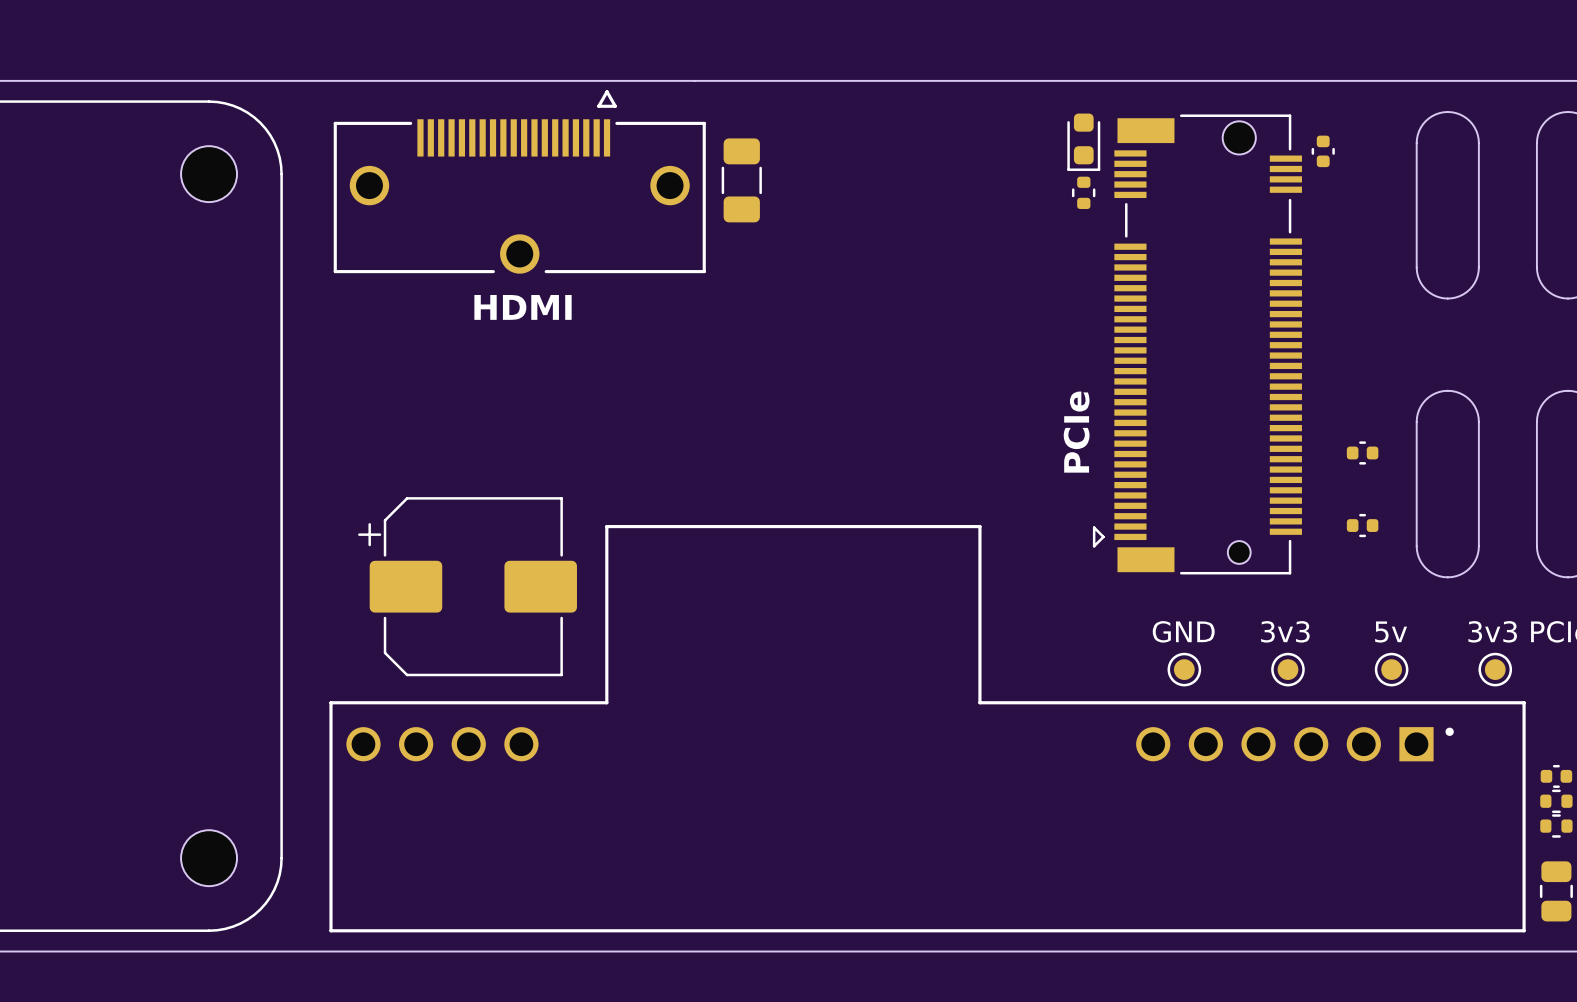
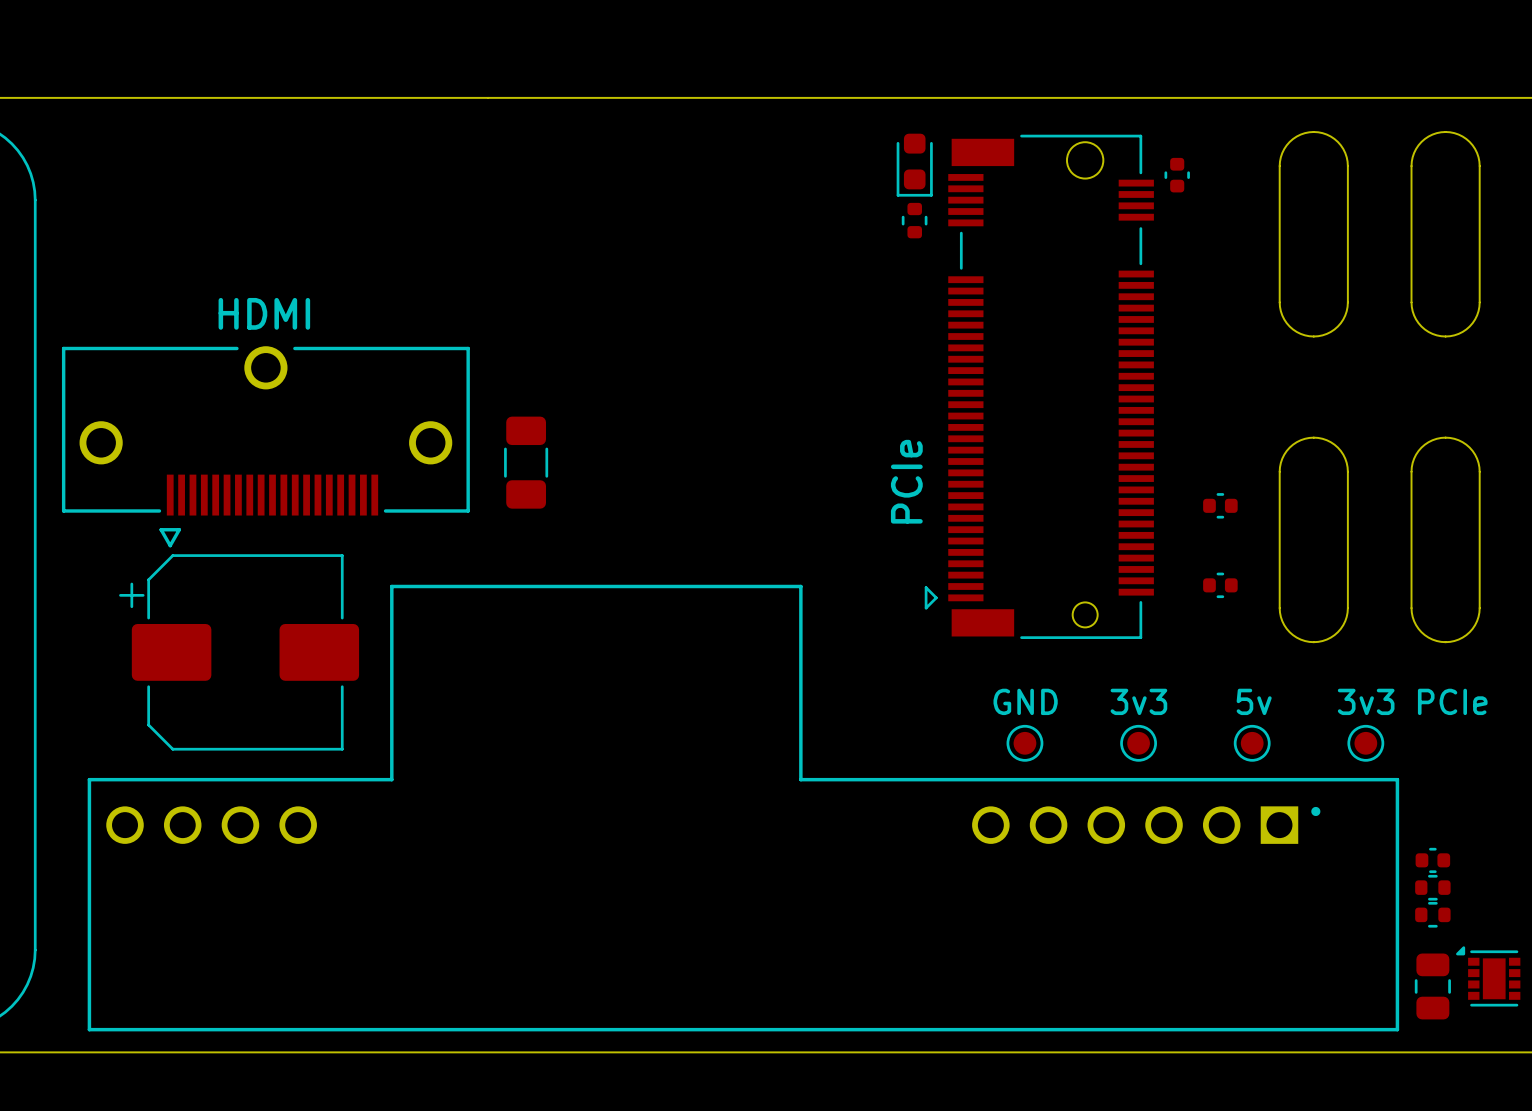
part position: (741, 180) -> (526, 462)
part rotation: 0° (519, 181) -> 180° (265, 446)
text position: HDMI (523, 307) -> HDMI (264, 313)

